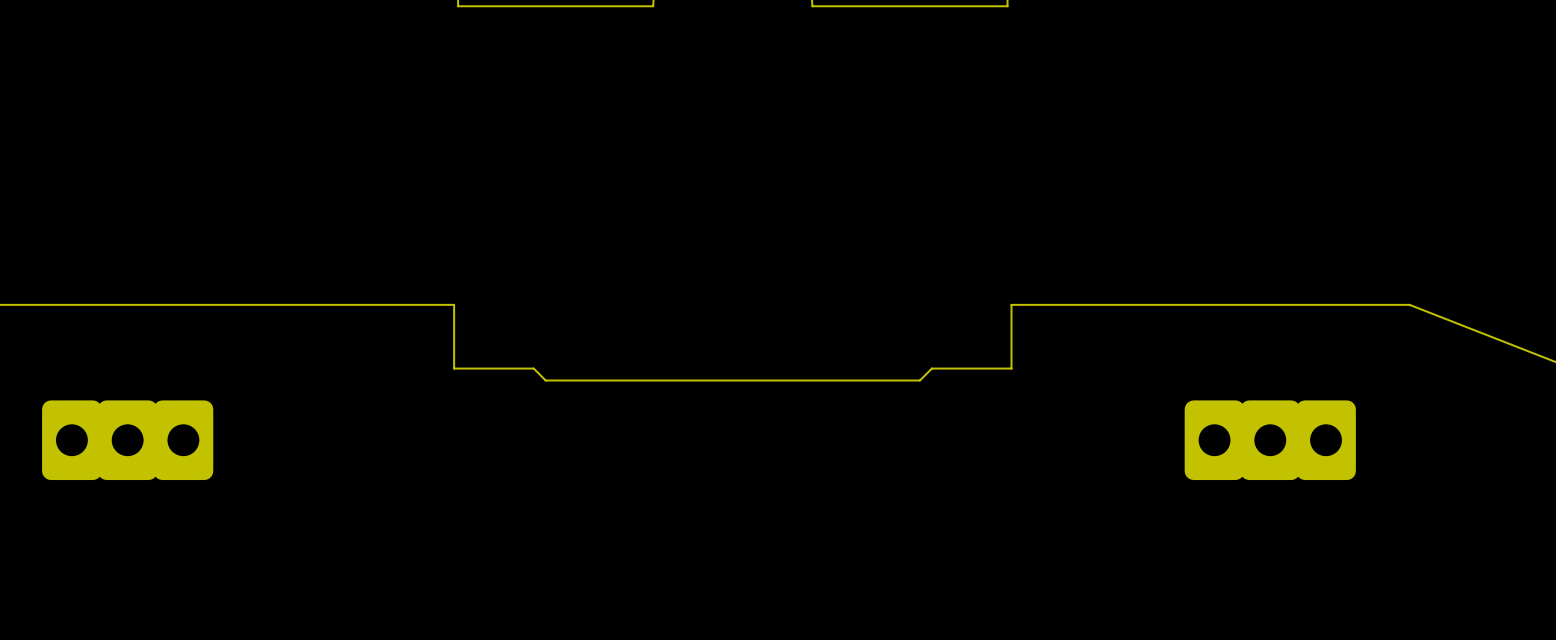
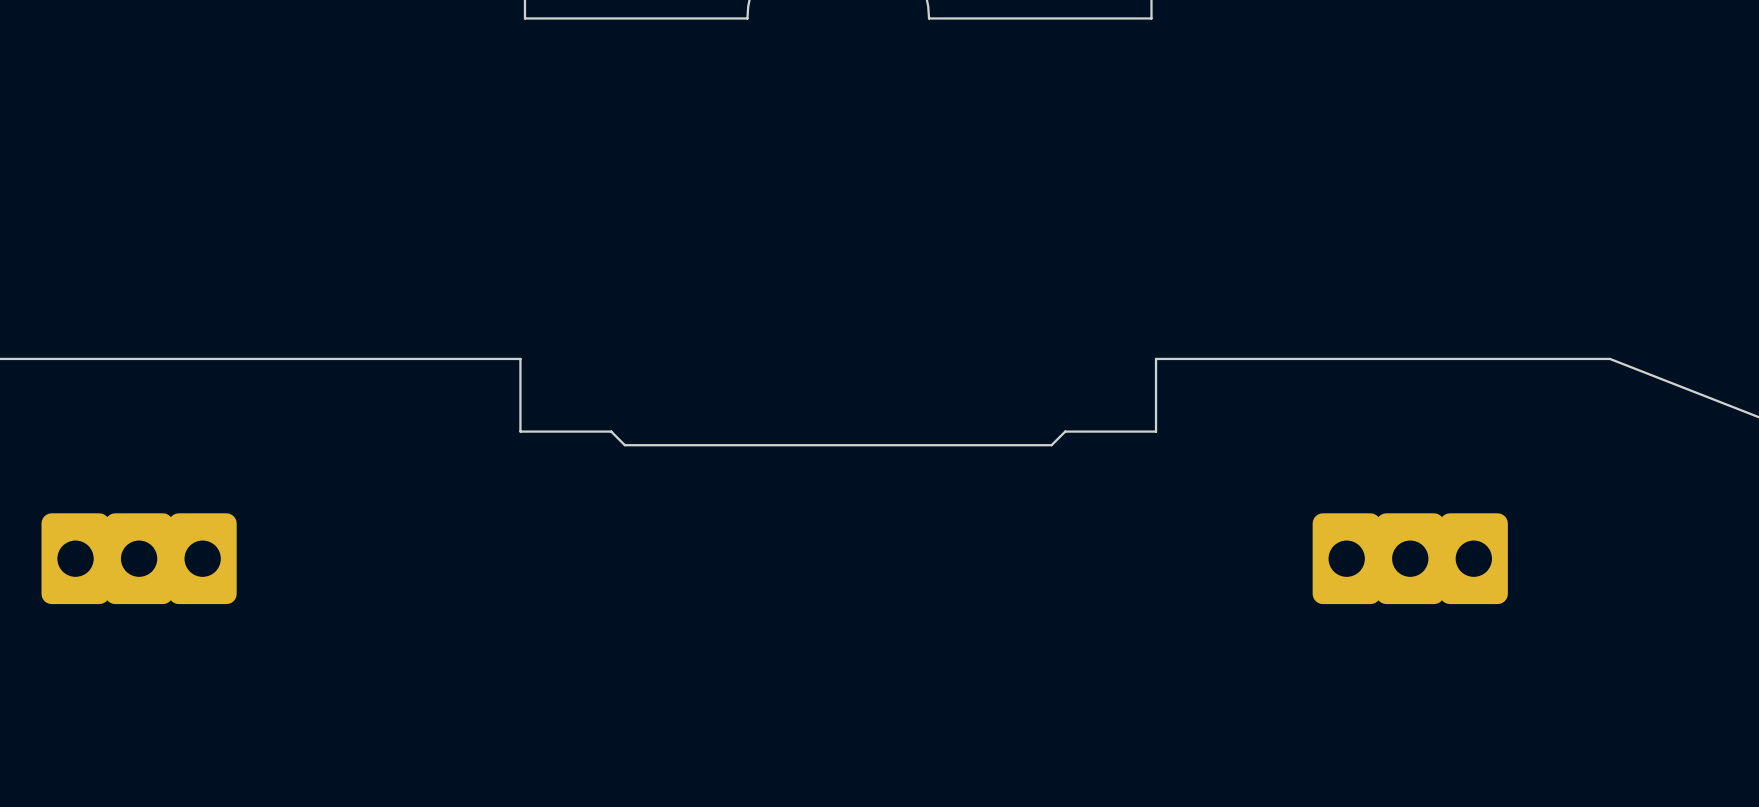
part position: (127, 440) -> (139, 558)
part position: (1270, 440) -> (1410, 558)

